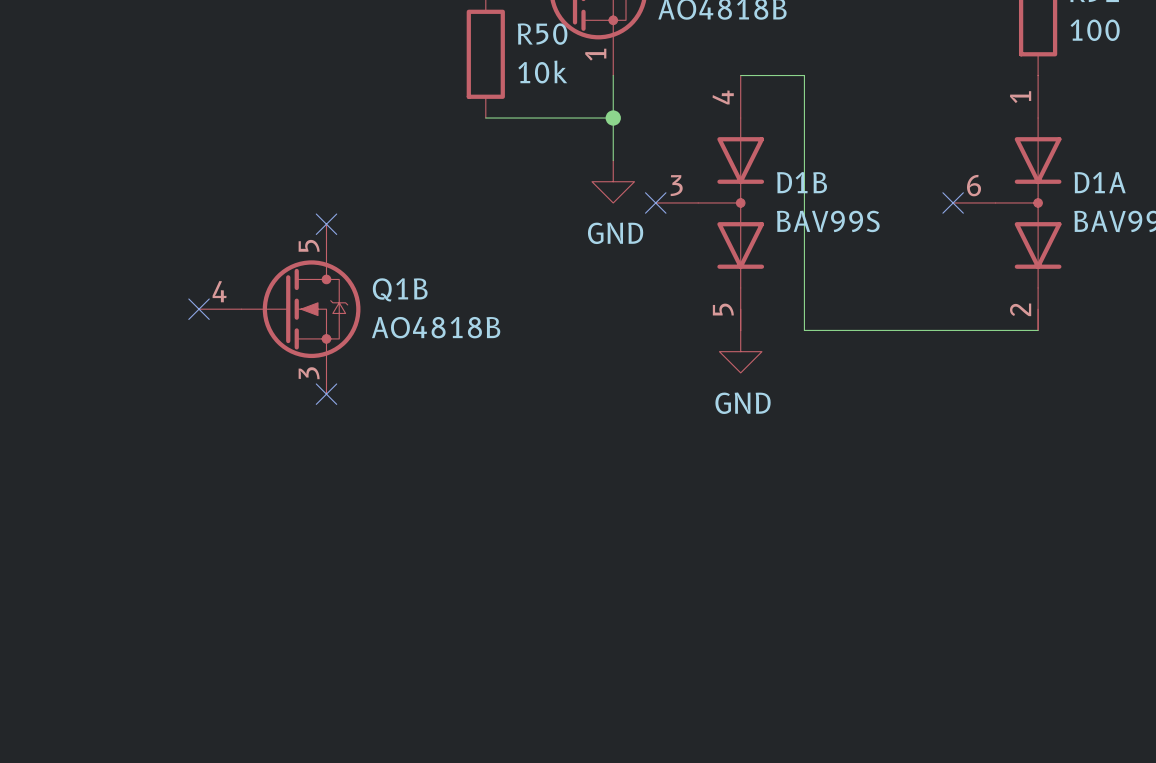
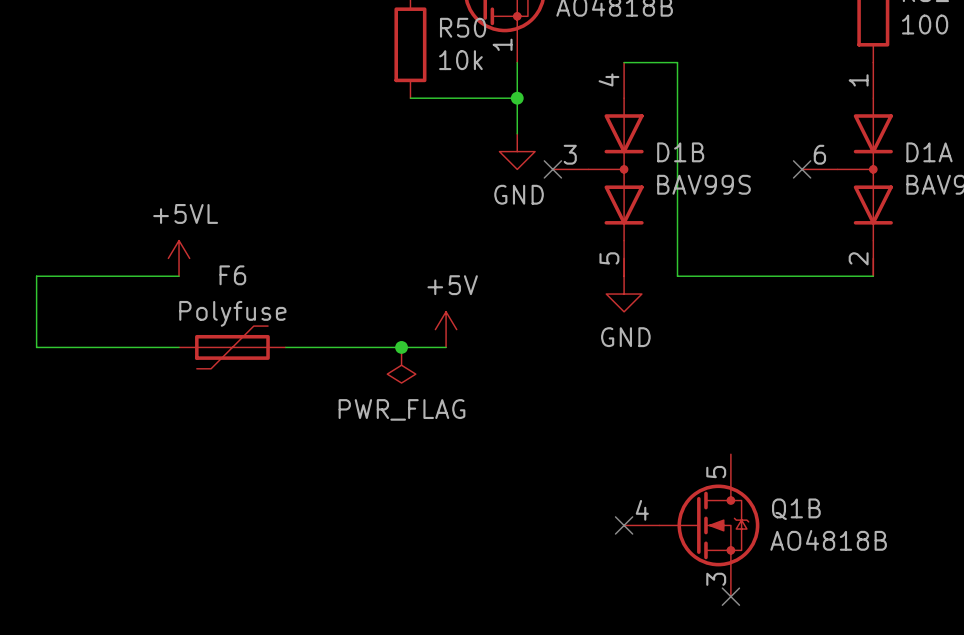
no-connect mark: (326, 224) -> none
no-connect mark: (199, 309) -> none
power symbol: none -> +5VL (179, 258)
Q1B position: (279, 309) -> (691, 525)
wire: none -> (179, 276) (36, 276) (36, 347) (179, 347)
no-connect mark: (326, 394) -> none
power symbol: none -> +5V (446, 329)
F6: none -> Polyfuse (232, 347)
wire: none -> (285, 347) (446, 347)
junction: none -> (401, 347)
power symbol: none -> PWR_FLAG (401, 365)
no-connect mark: none -> (624, 525)
no-connect mark: none -> (730, 596)

